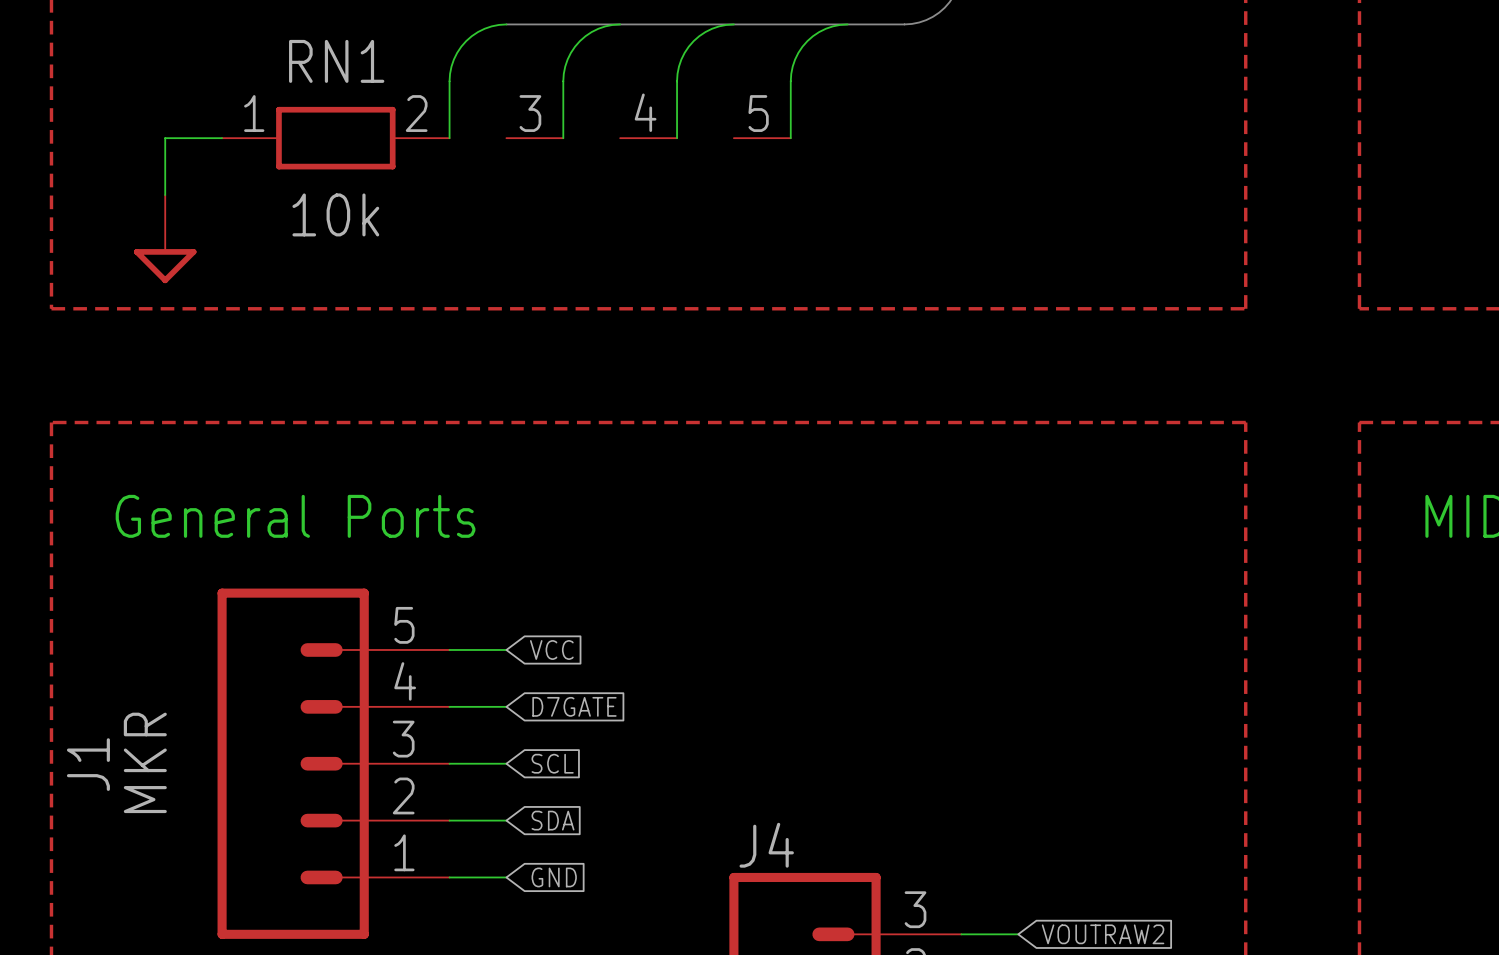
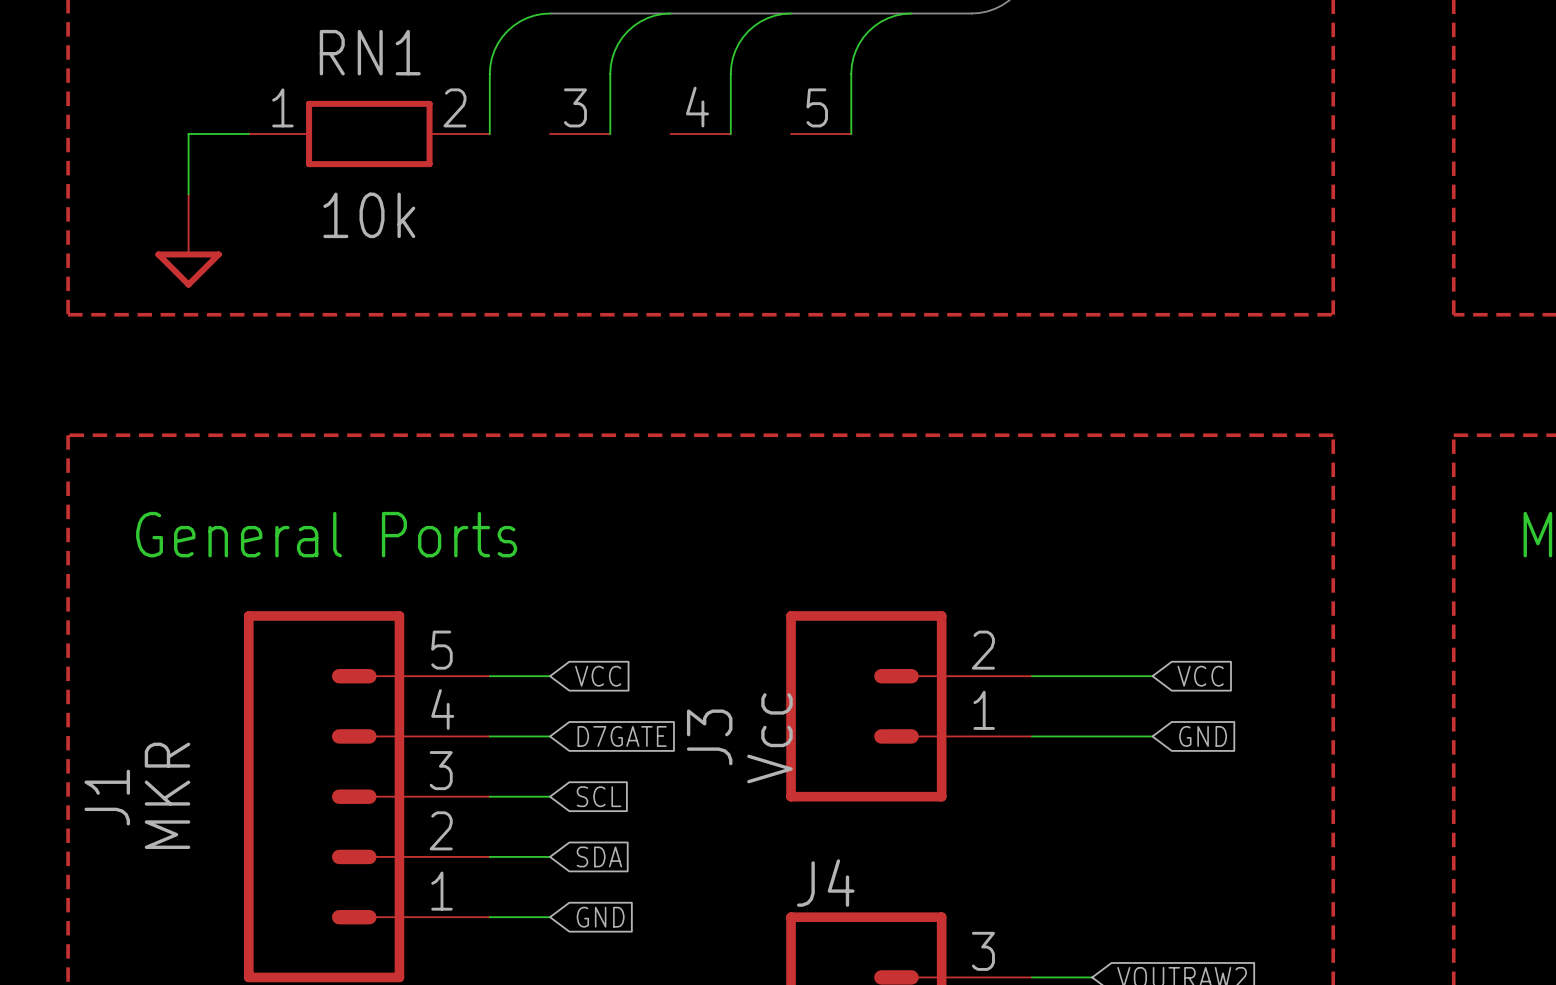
wire: none -> (1032, 676) (1152, 676)
global label: none -> VCC (1200, 676)
J3: none -> Vcc (909, 706)
wire: none -> (1032, 736) (1152, 736)
global label: none -> GND (1203, 736)

